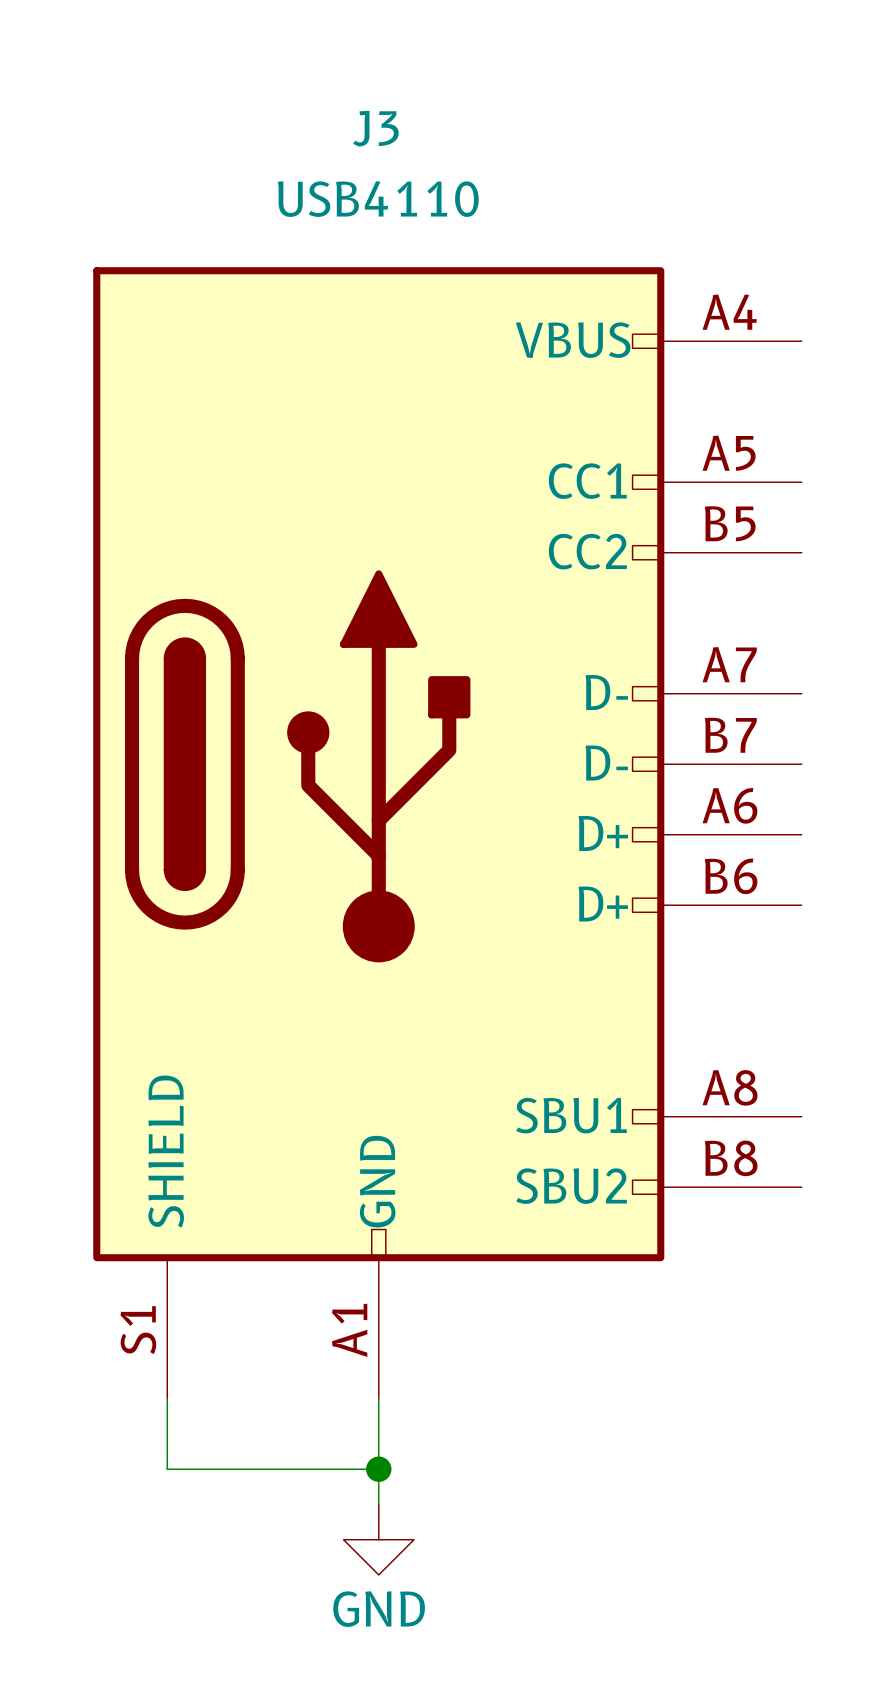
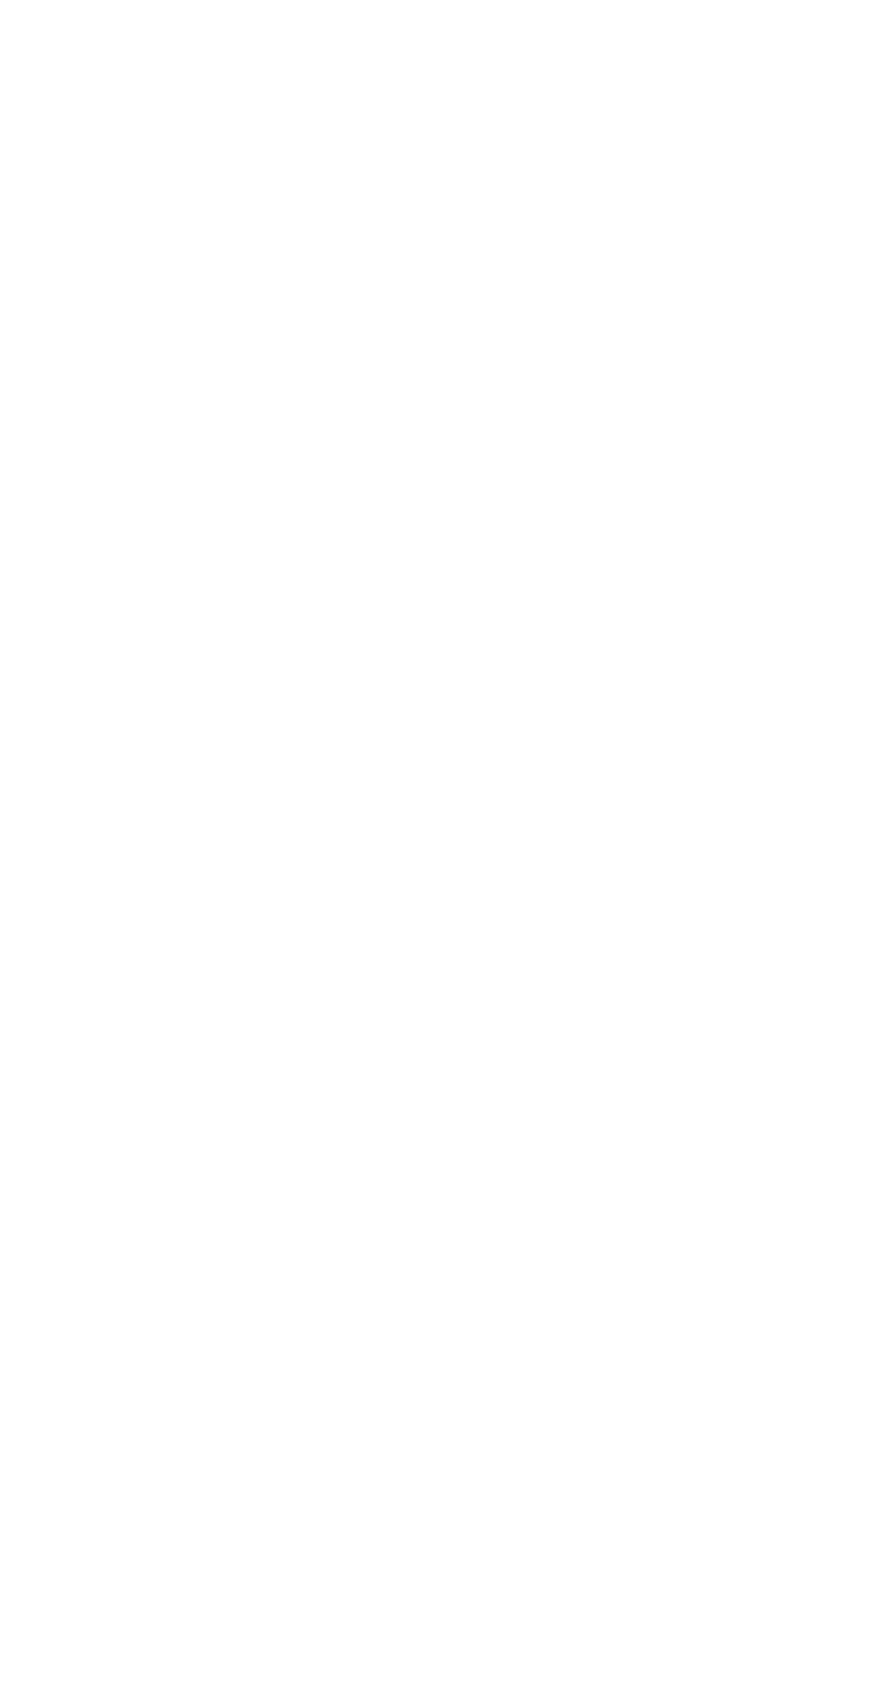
J3: USB4110 (447, 832) -> none
wire: (167, 1398) (167, 1469) (378, 1469) -> none
wire: (378, 1398) (378, 1504) -> none
junction: (378, 1469) -> none
power symbol: GND (378, 1539) -> none

